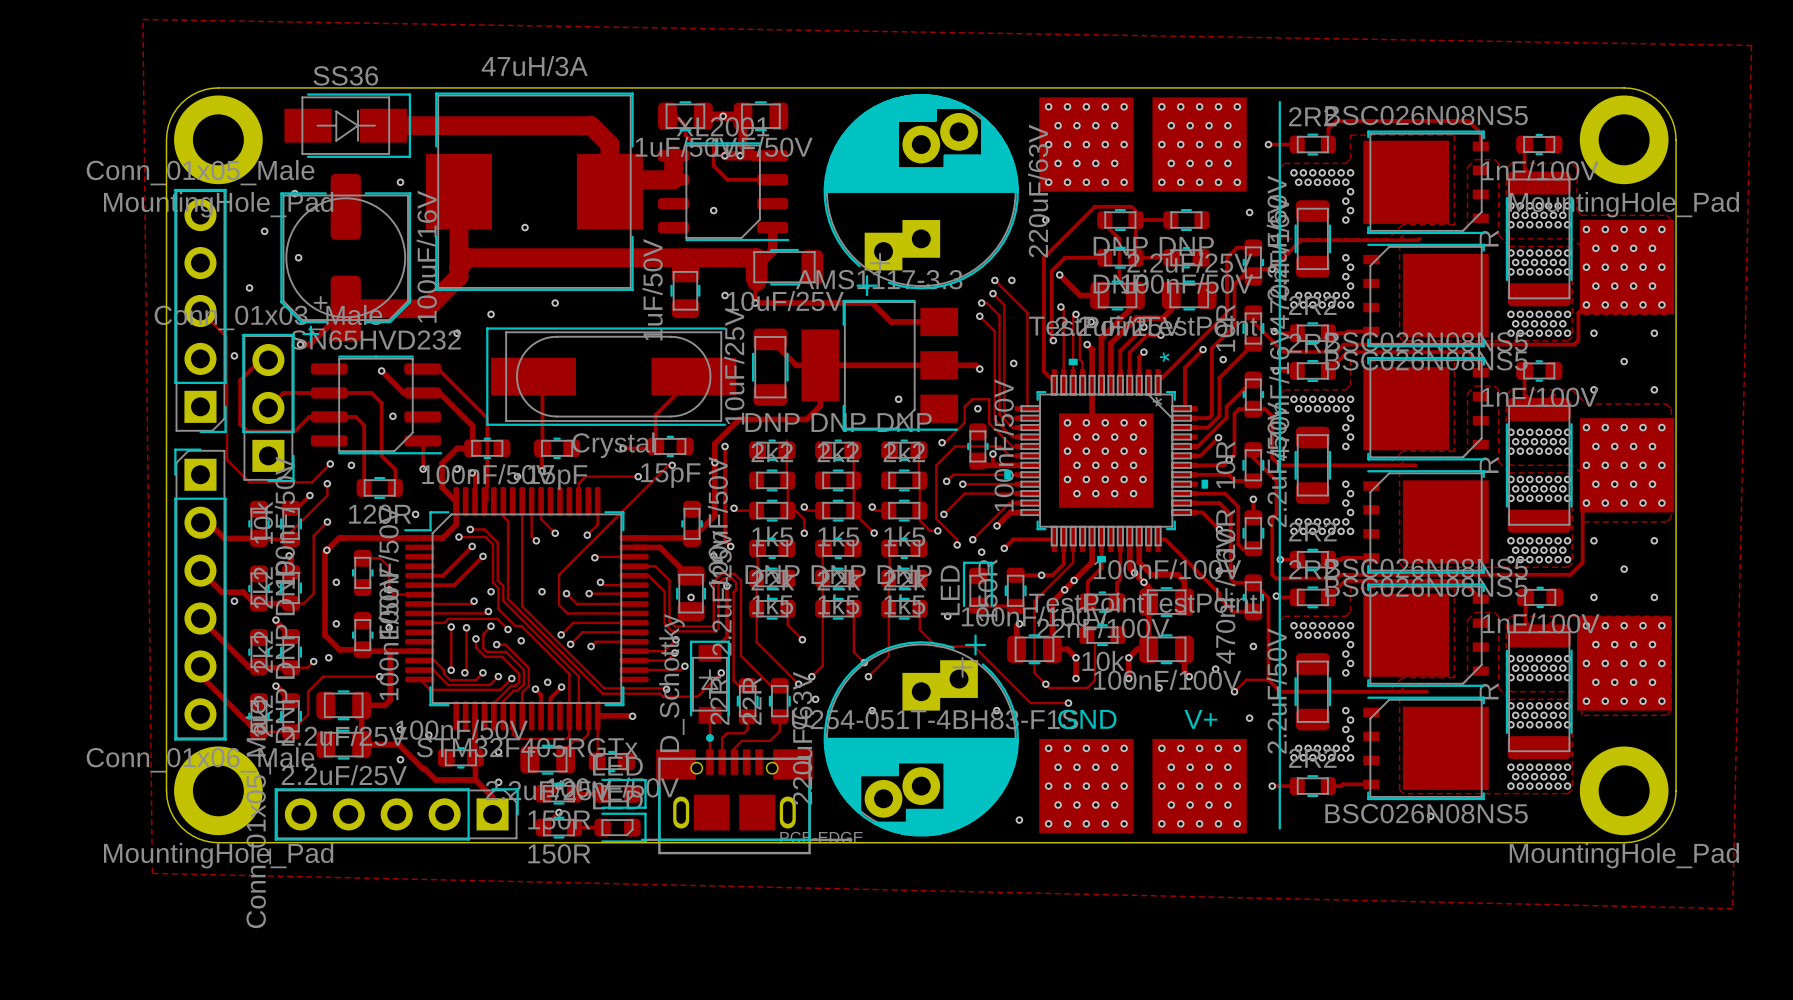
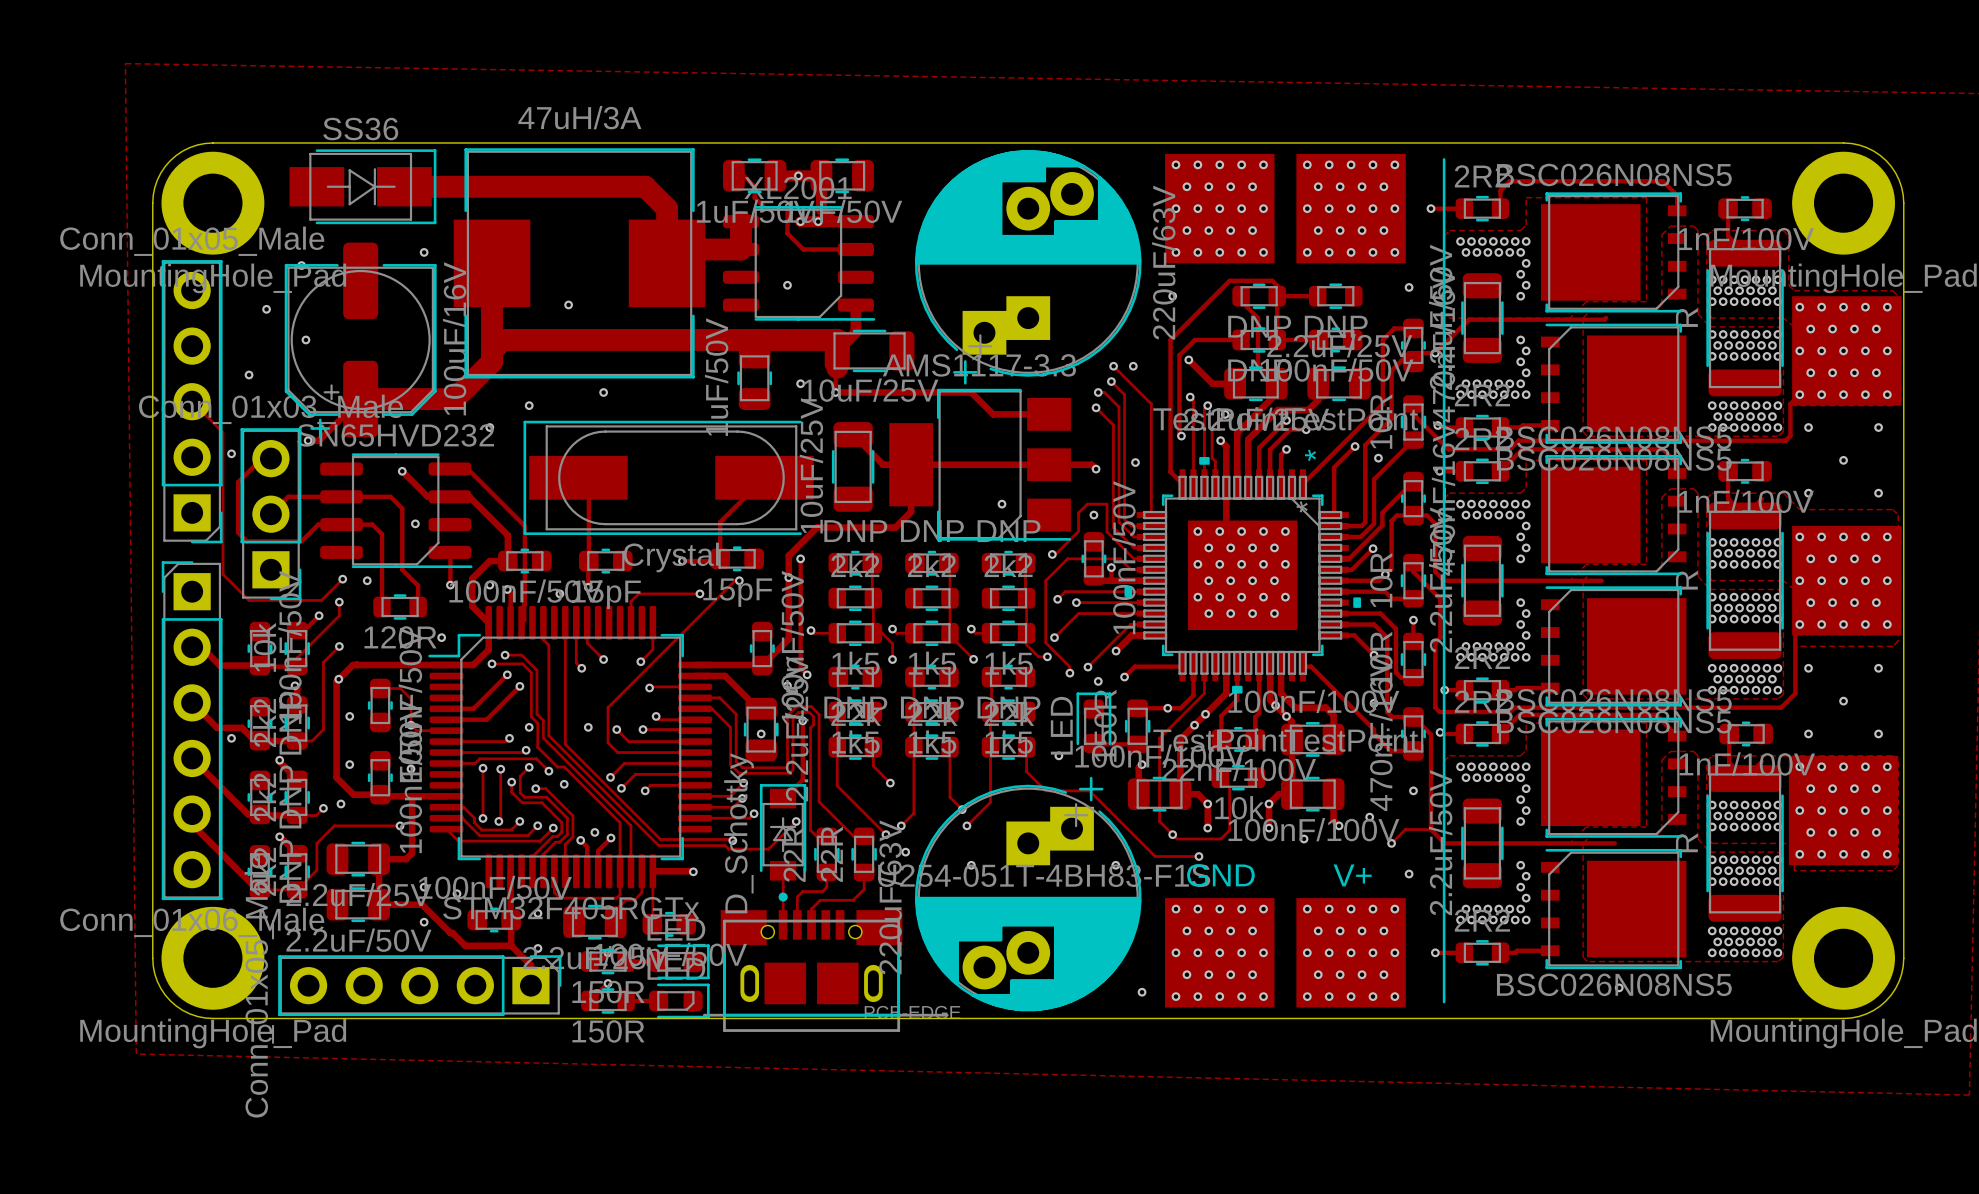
part value: 2.2uF/25V (344, 775) -> 2.2uF/50V (359, 940)

